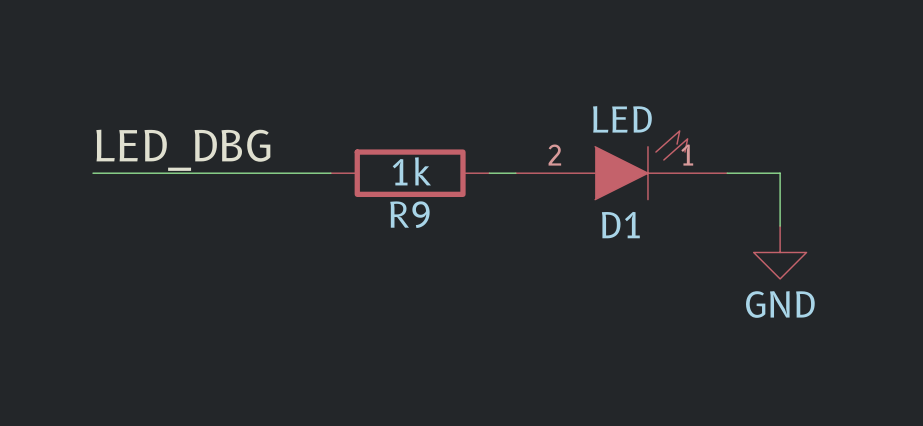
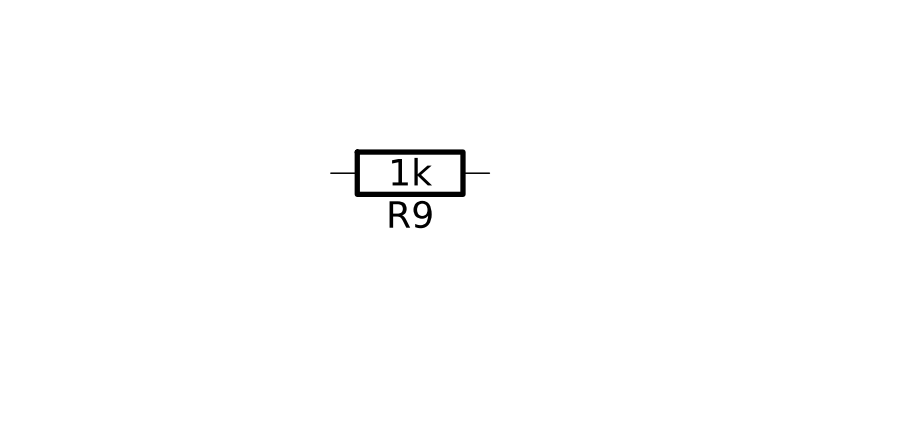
label: LED_DBG (183, 150) -> none
D1: LED (621, 165) -> none
wire: (93, 173) (330, 173) -> none
wire: (489, 173) (515, 173) -> none
wire: (727, 173) (780, 173) (780, 226) -> none
power symbol: GND (780, 252) -> none

